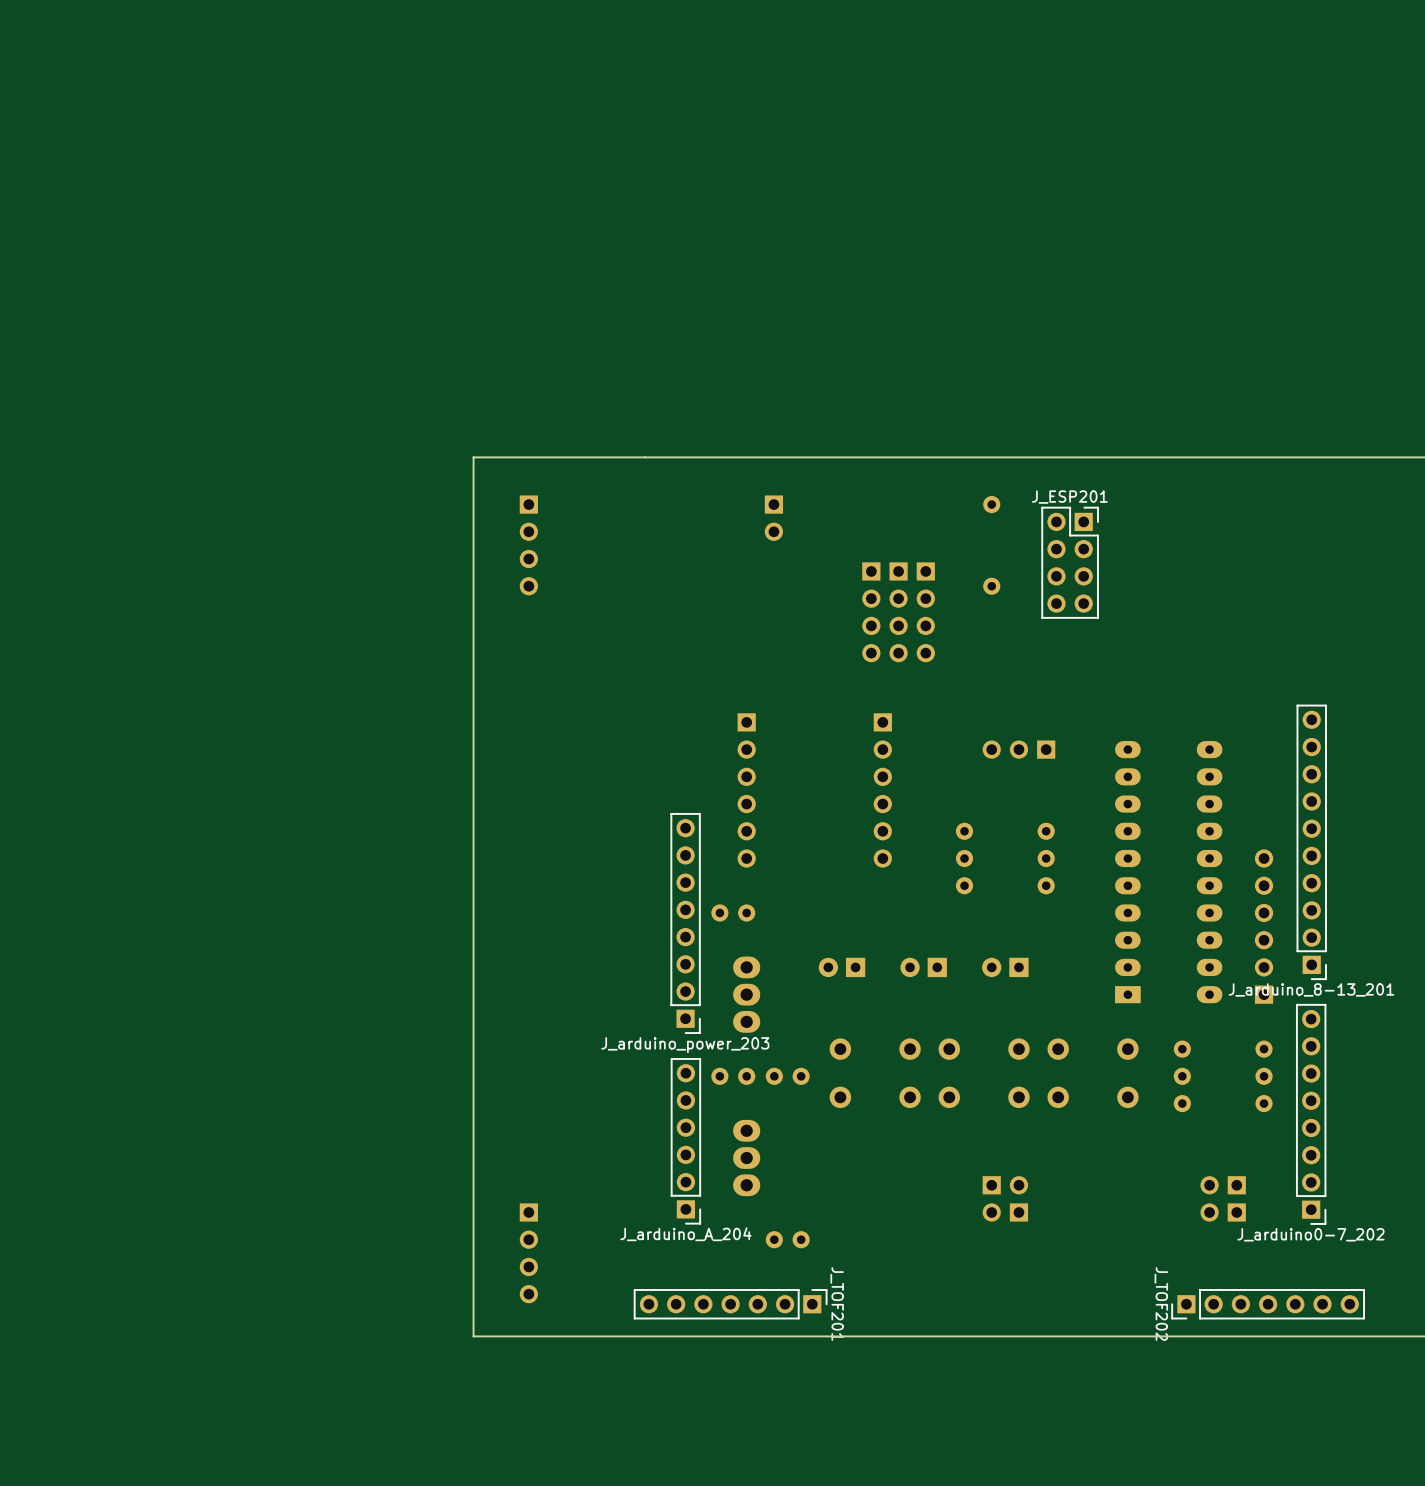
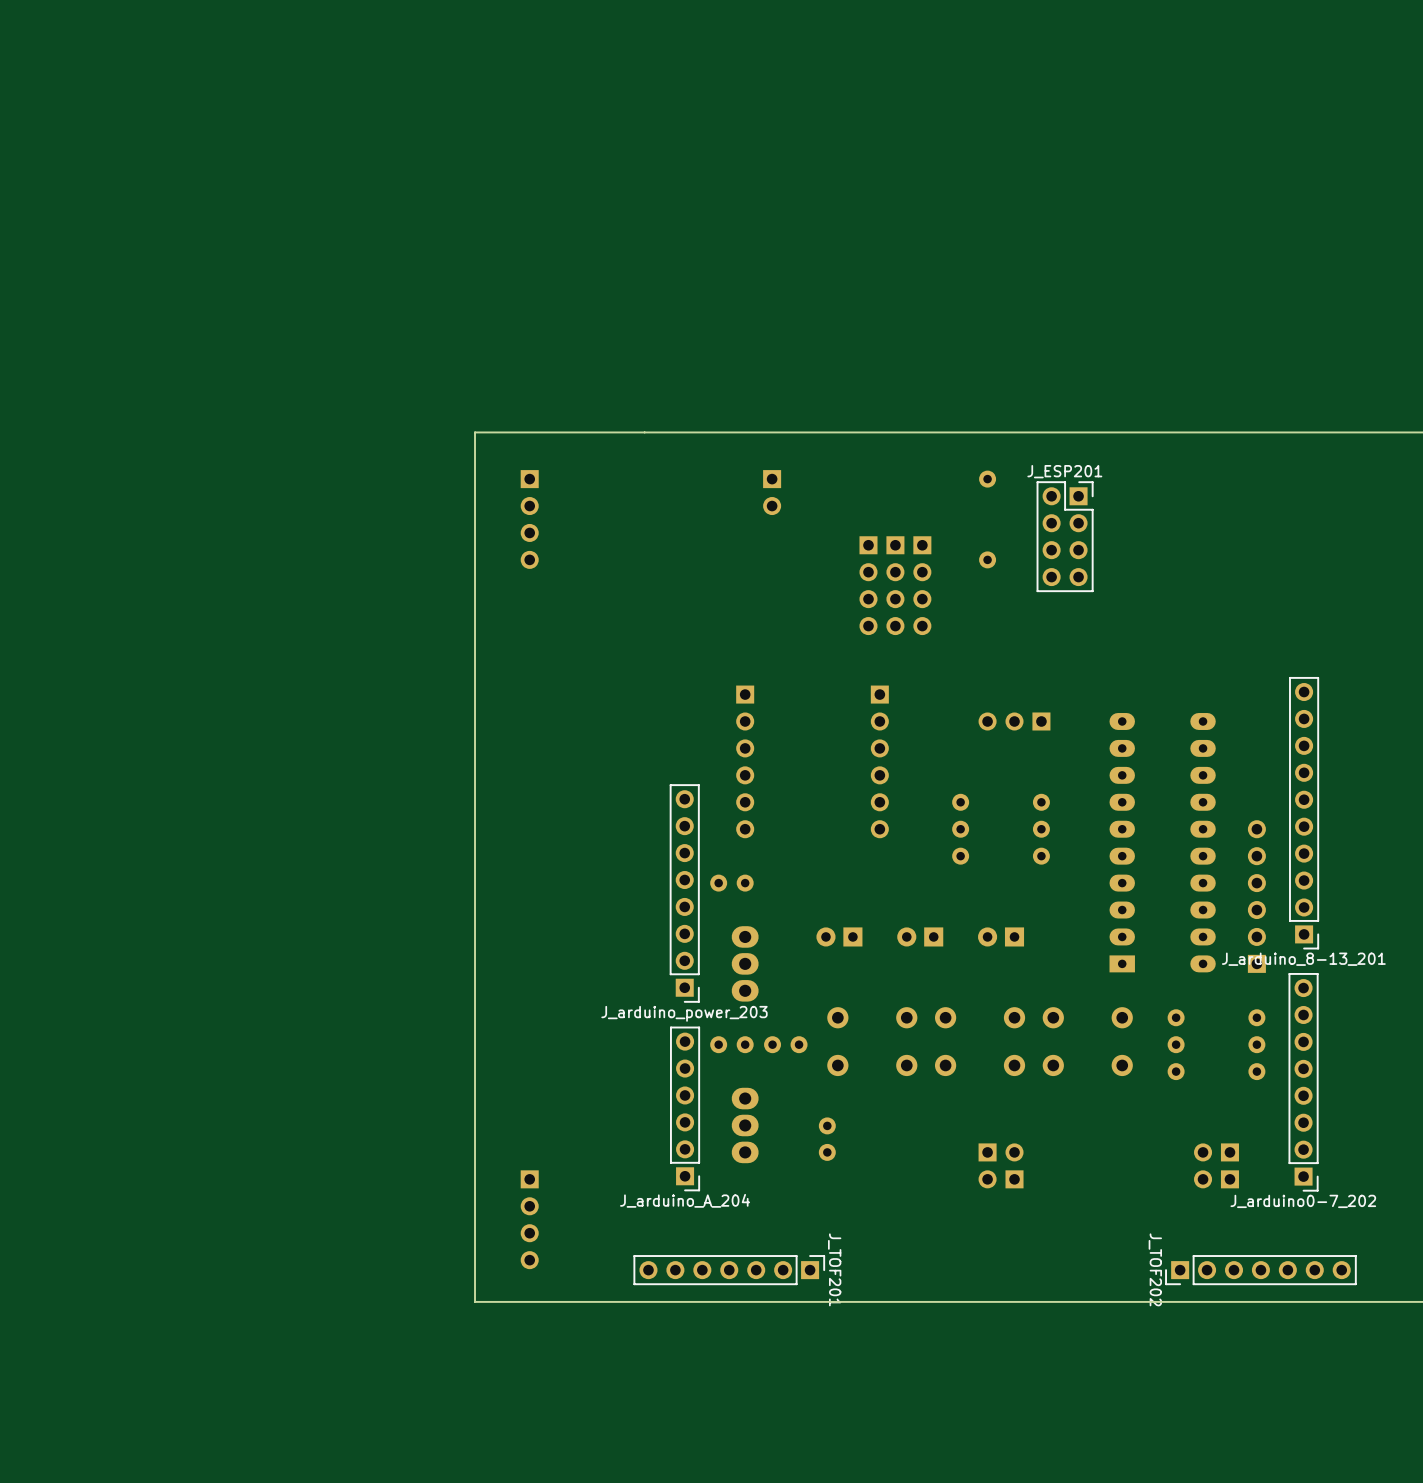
part rotation: 0° (787, 1239) -> 90° clockwise (827, 1139)
part position: (787, 1239) -> (827, 1139)

